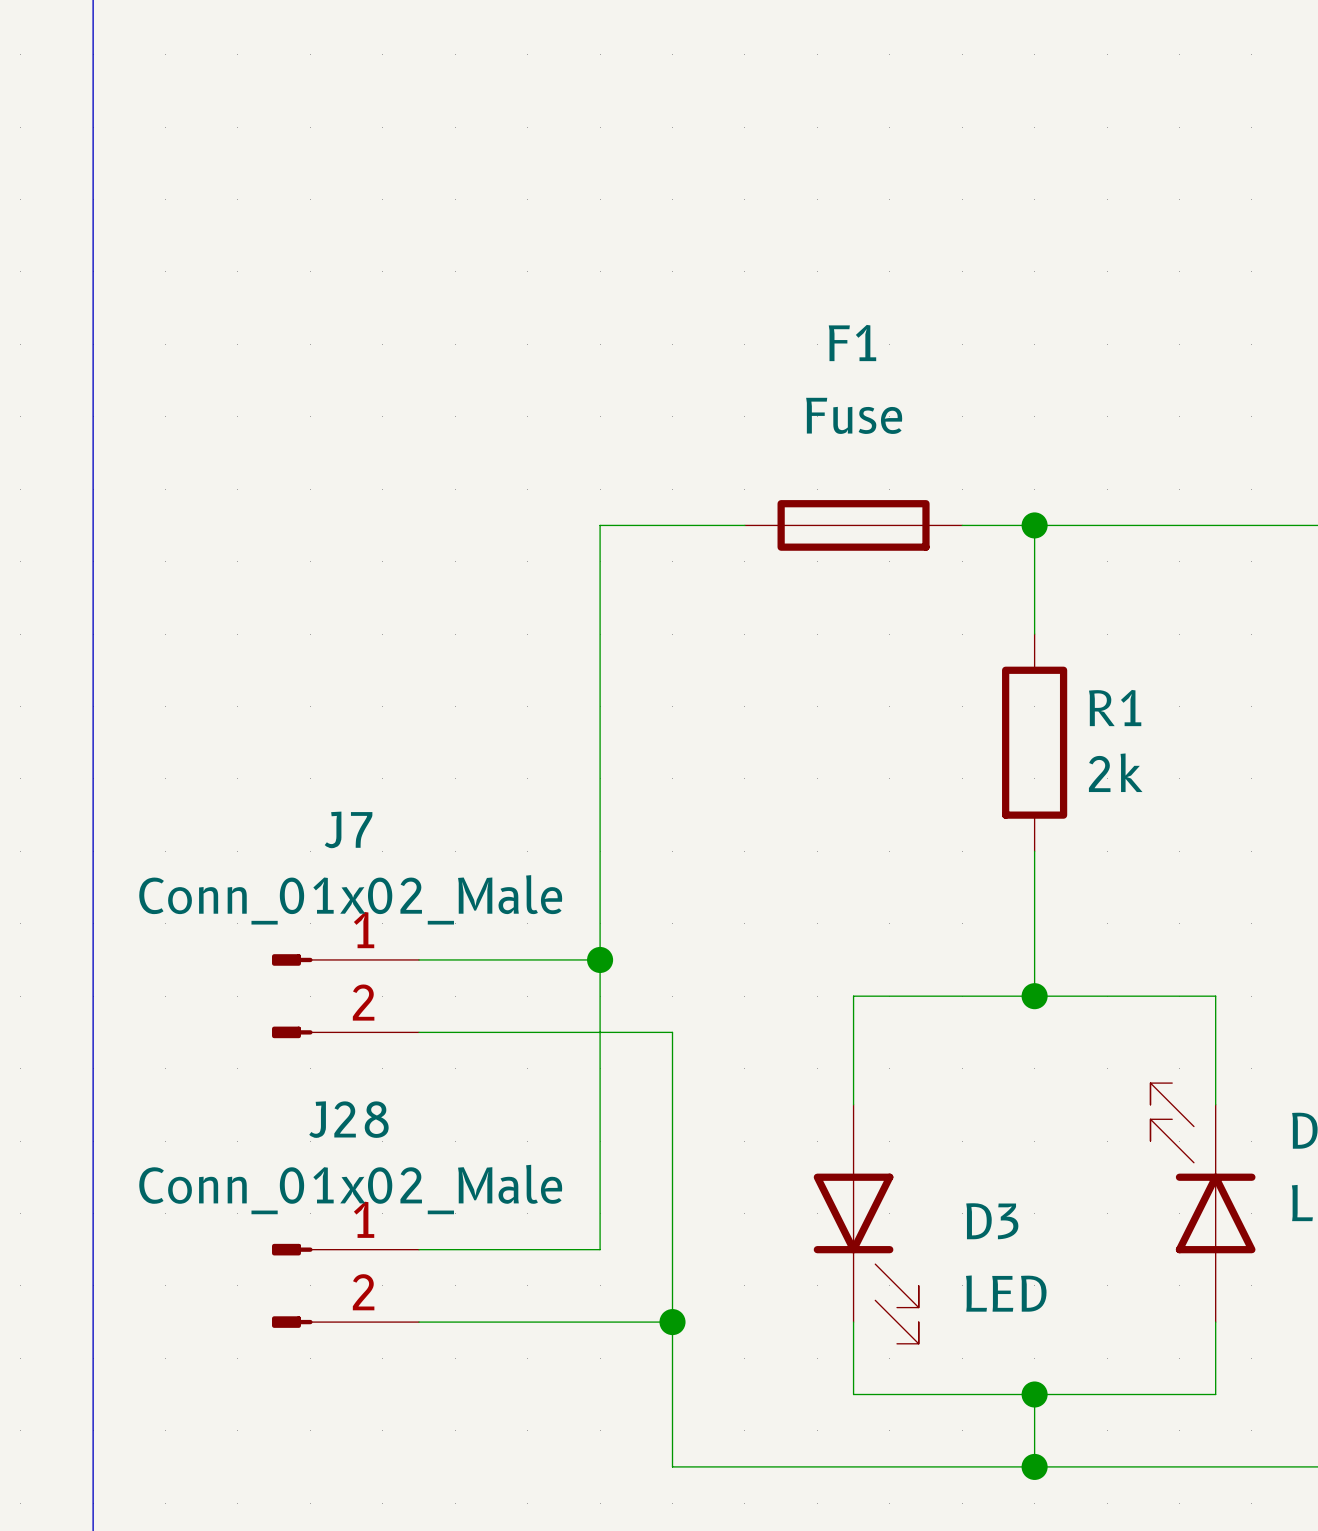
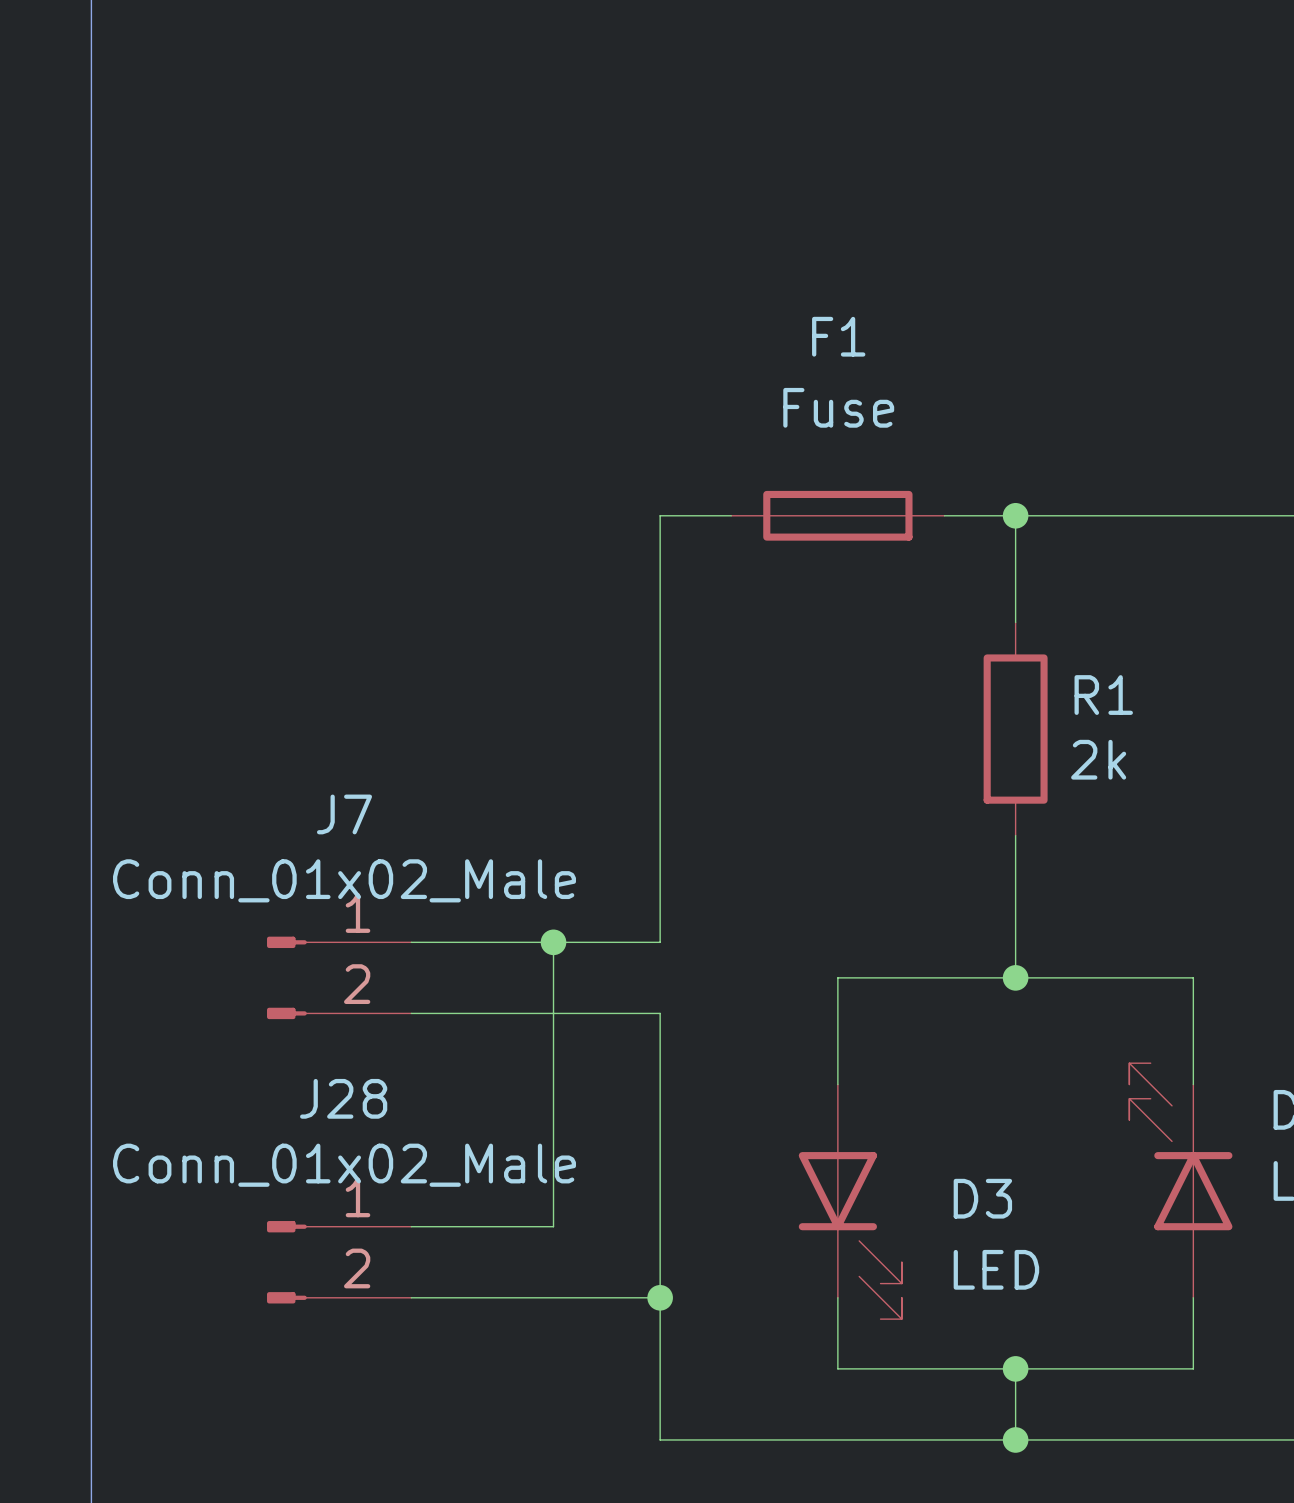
wire: (672, 525) (600, 525) (600, 1249) (563, 1249) -> (660, 515) (660, 942) (589, 942)
wire: none -> (553, 942) (553, 1226)
junction position: (600, 959) -> (553, 942)

